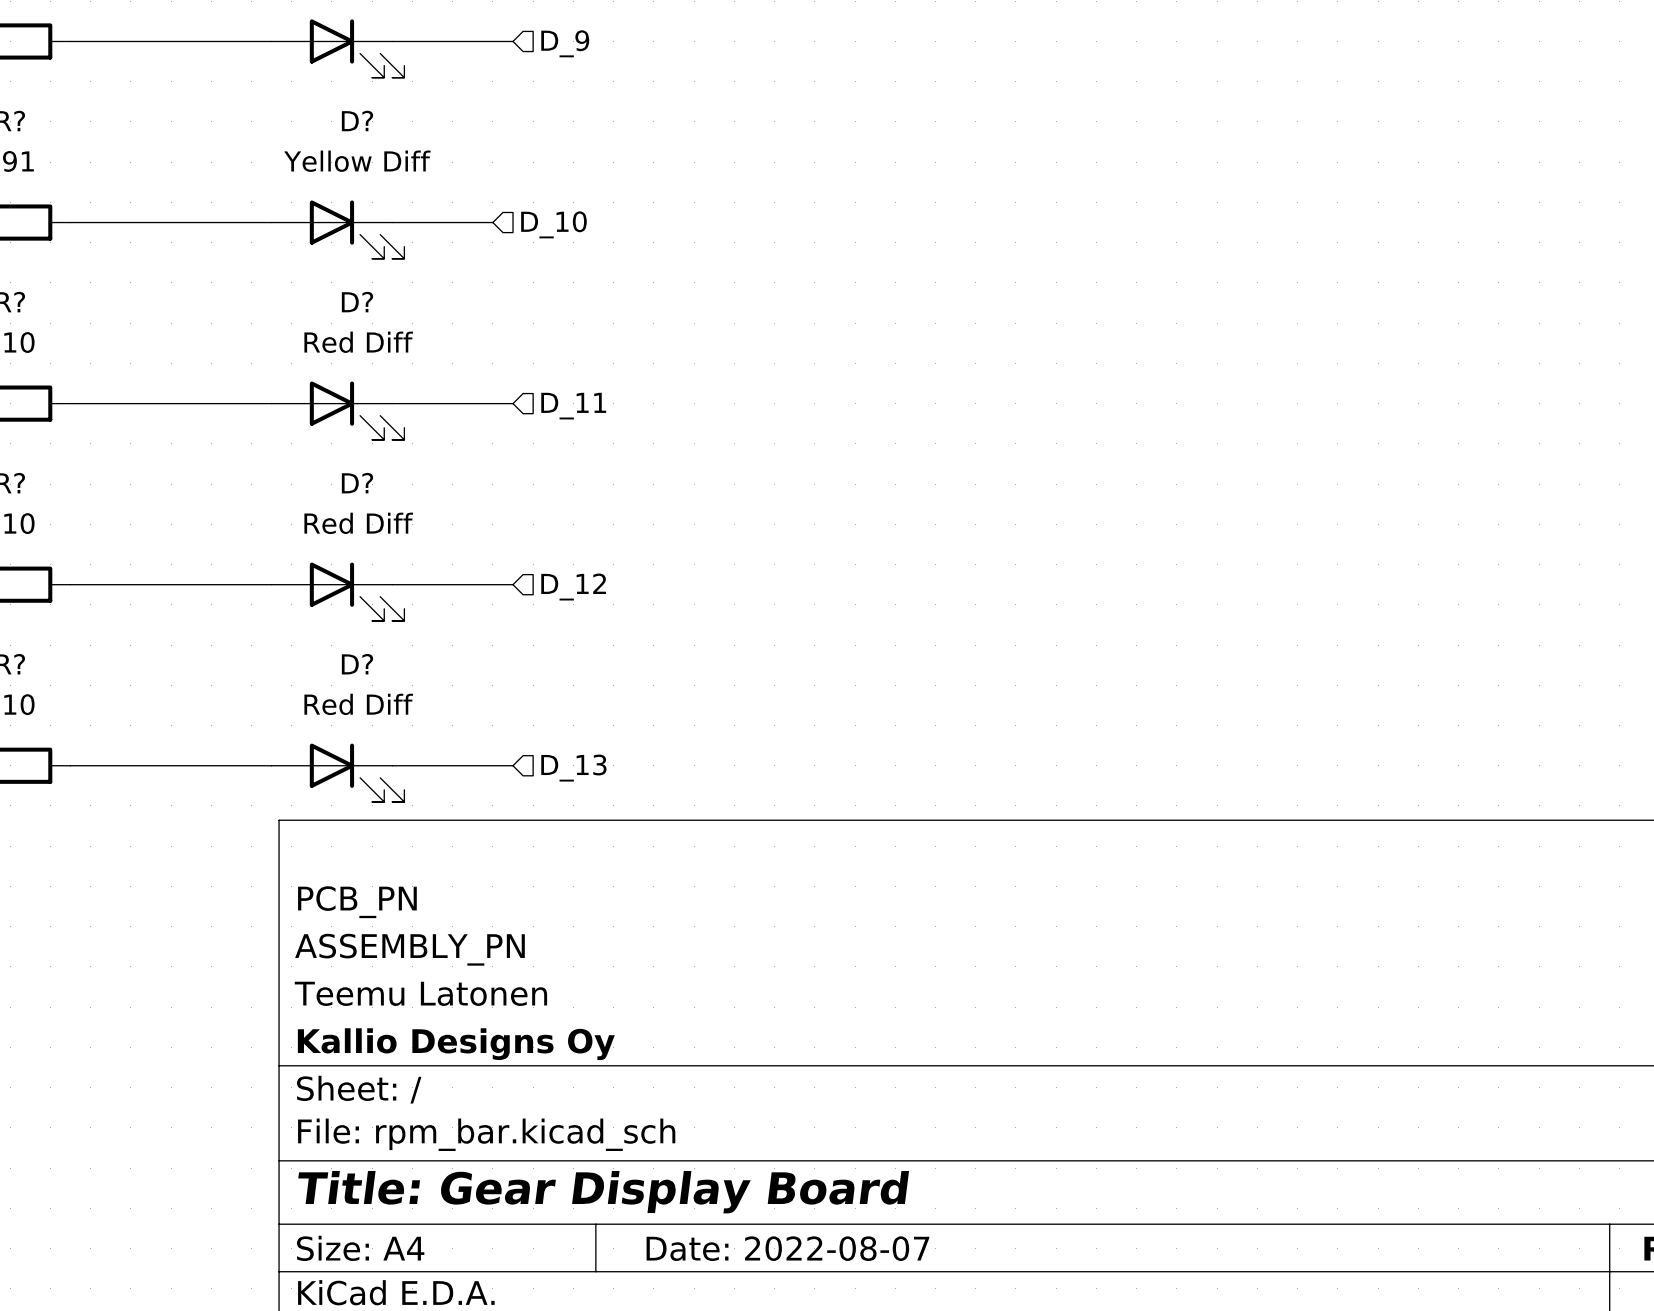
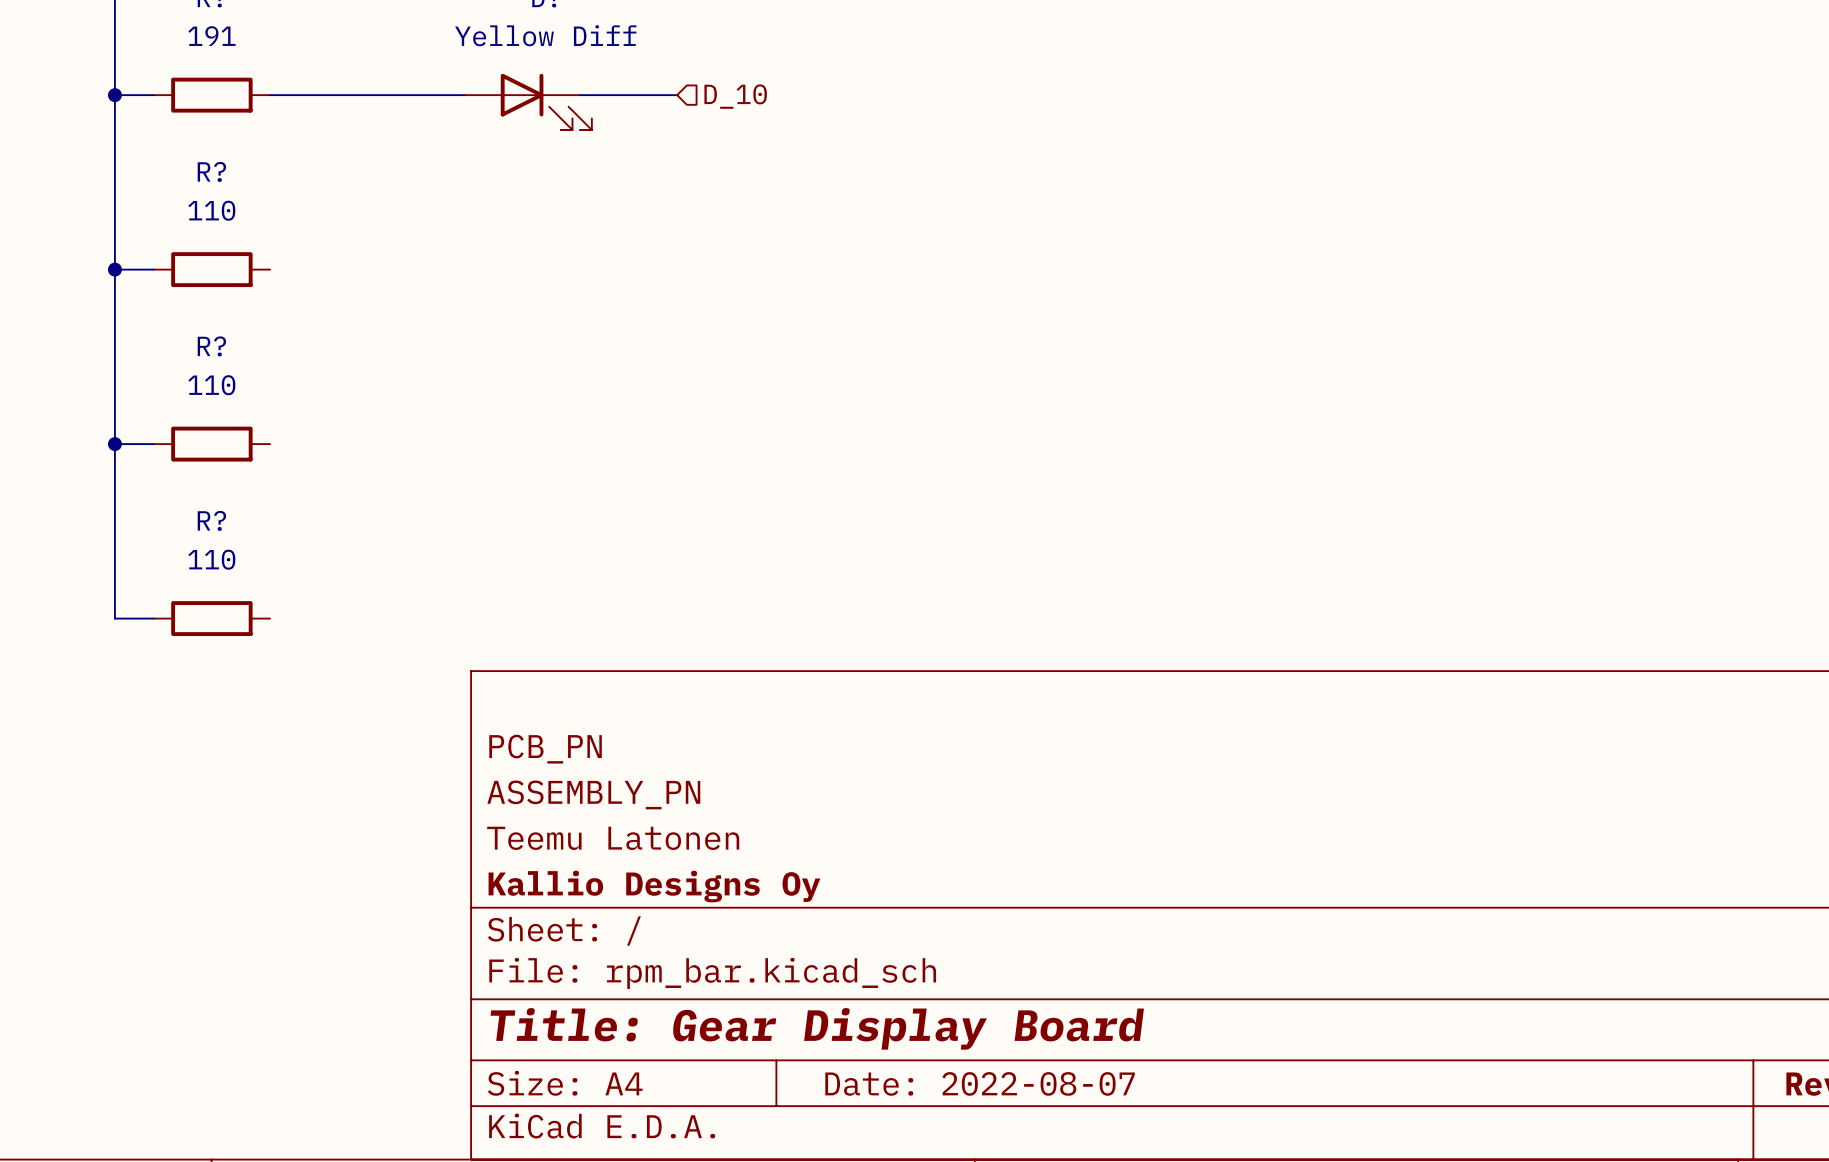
wire: (70, 403) (271, 403) -> none
wire: (392, 403) (513, 403) -> none
hierarchical label: D_11 (573, 406) -> none
D?: (337, 410) -> none
wire: (70, 584) (271, 584) -> none
wire: (392, 584) (513, 584) -> none
hierarchical label: D_12 (573, 587) -> none
D?: (337, 591) -> none
wire: (70, 765) (271, 765) -> none
wire: (392, 765) (513, 765) -> none
hierarchical label: D_13 (573, 768) -> none
D?: (337, 772) -> none

